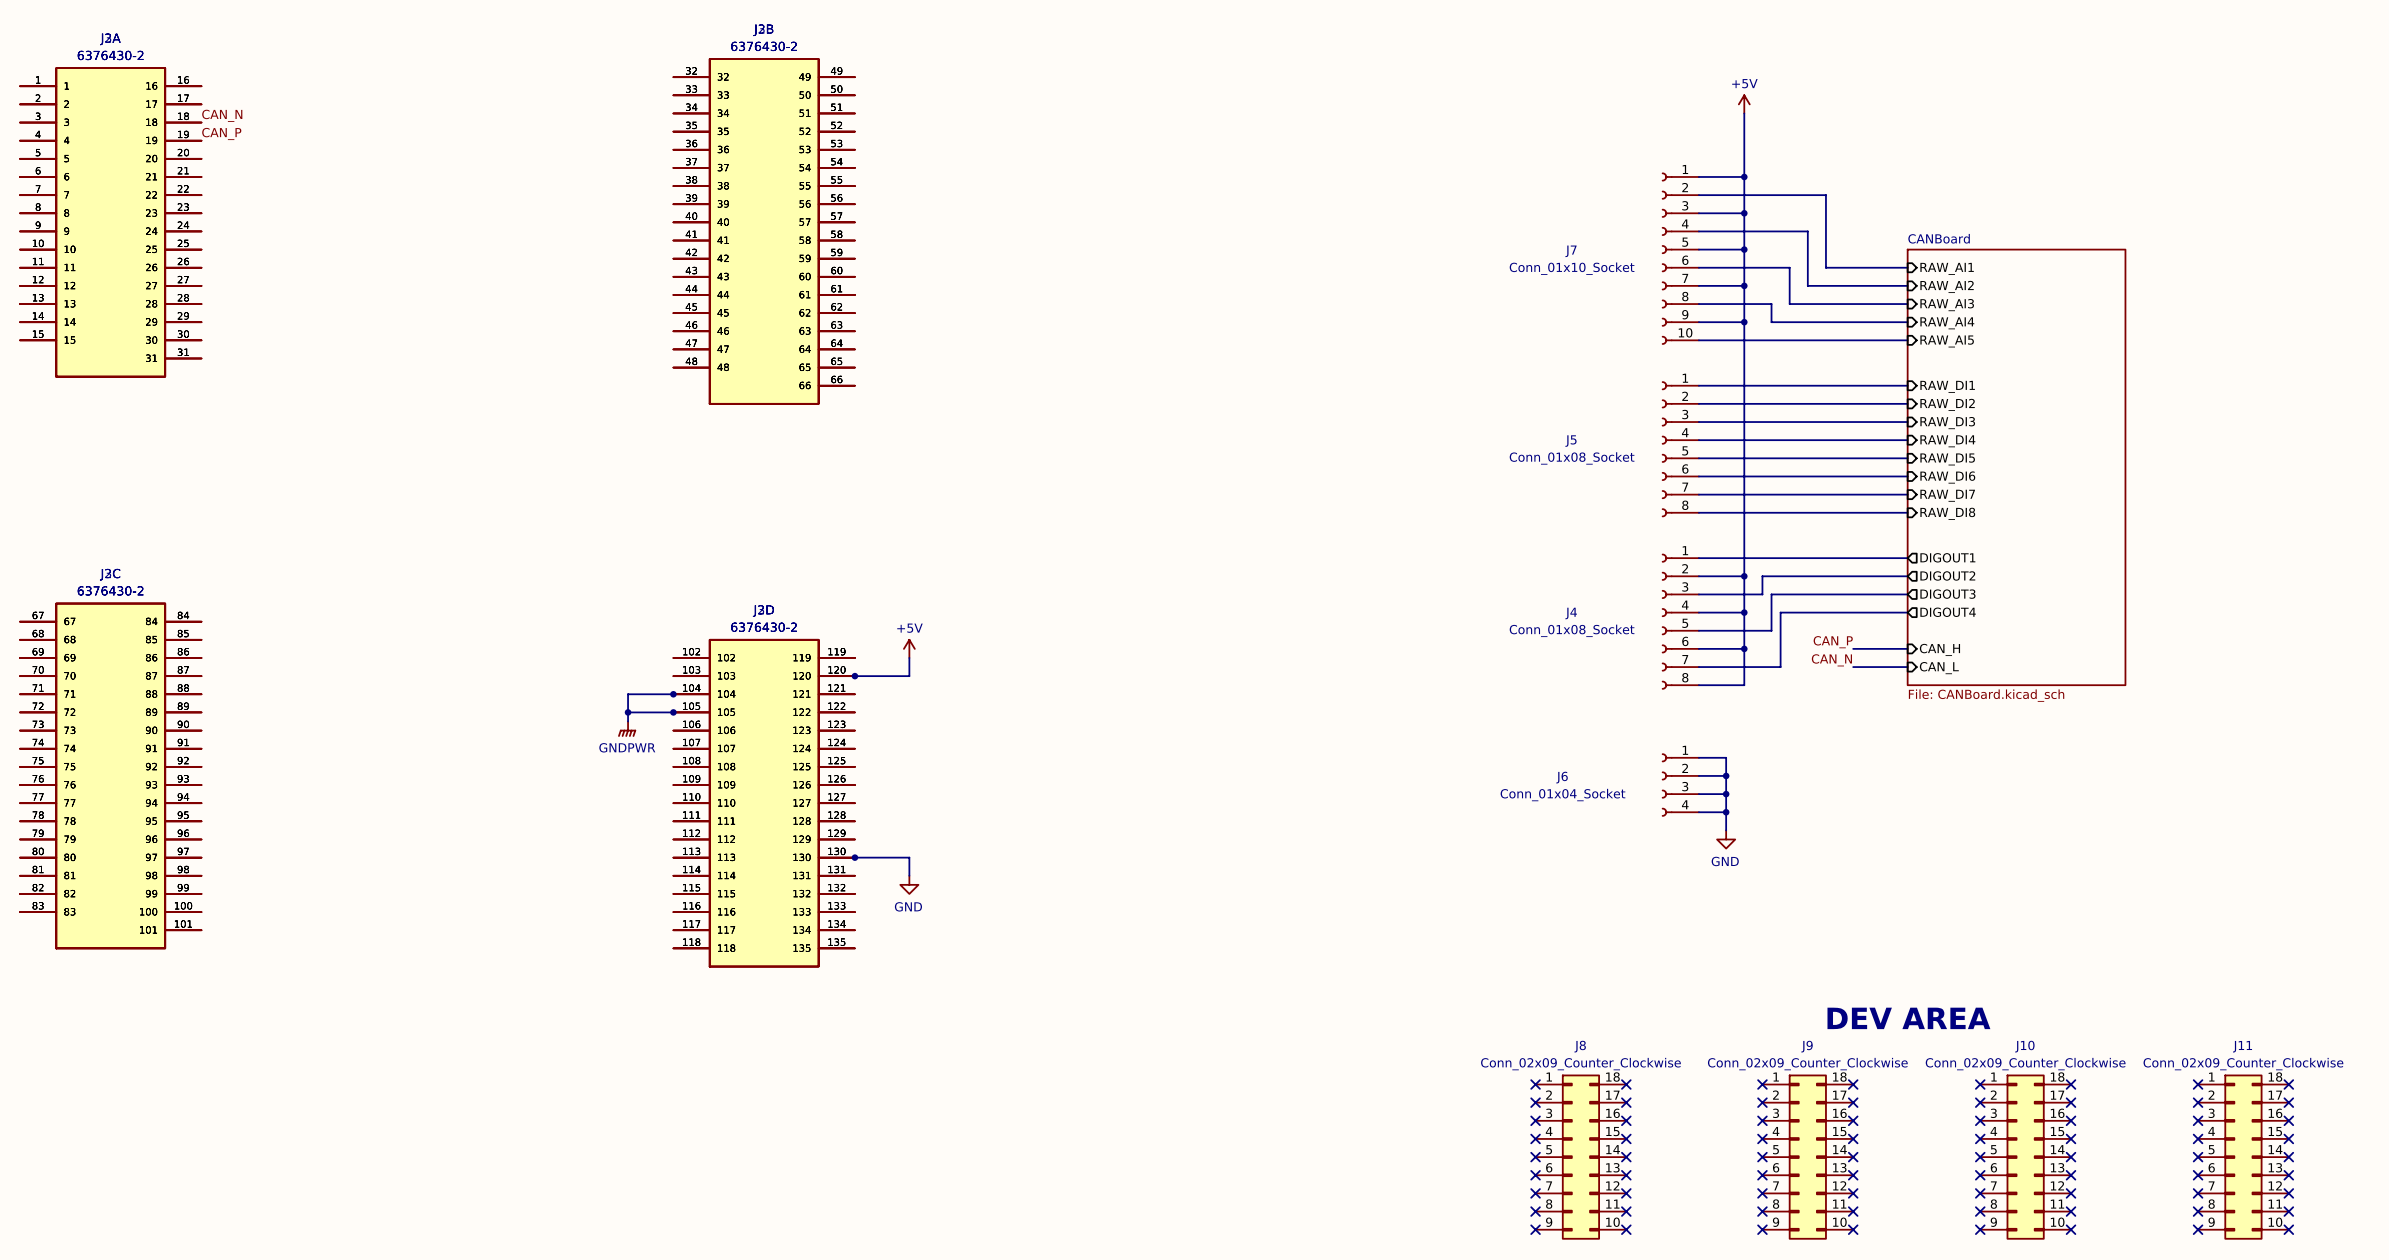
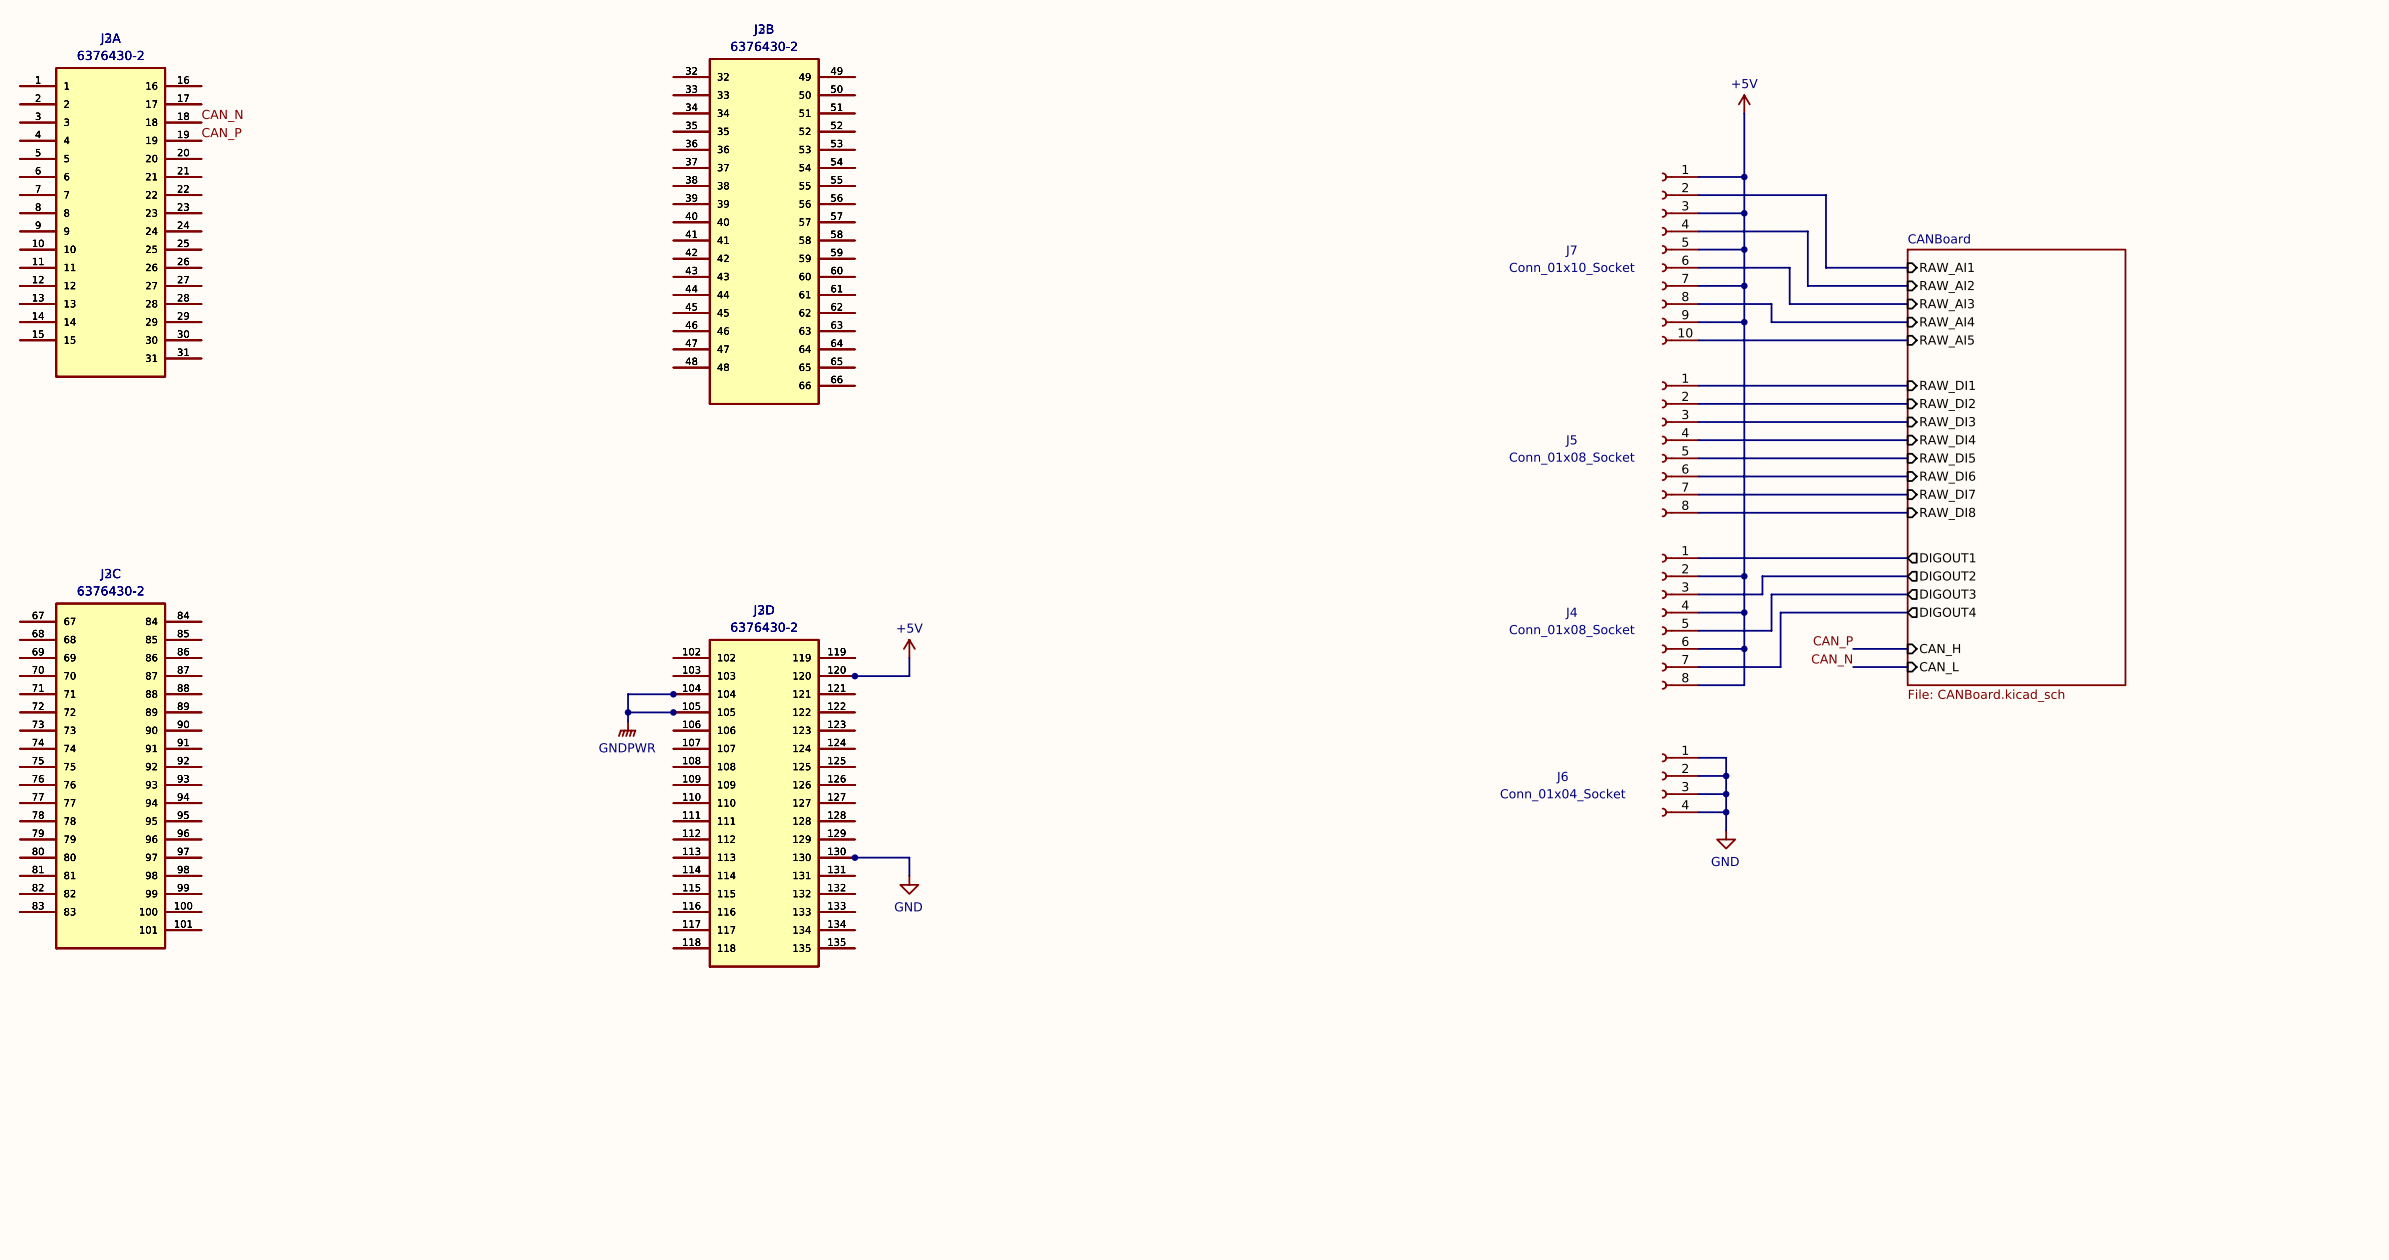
text: DEV AREA (1908, 1018) -> none
no-connect mark: (1535, 1084) -> none
no-connect mark: (1626, 1084) -> none
no-connect mark: (1762, 1084) -> none
no-connect mark: (1853, 1084) -> none
no-connect mark: (1980, 1084) -> none
no-connect mark: (2071, 1084) -> none
no-connect mark: (2198, 1084) -> none
no-connect mark: (2288, 1084) -> none
no-connect mark: (1535, 1102) -> none
no-connect mark: (1626, 1102) -> none
no-connect mark: (1762, 1102) -> none
no-connect mark: (1853, 1102) -> none
no-connect mark: (1980, 1102) -> none
no-connect mark: (2071, 1102) -> none
no-connect mark: (2198, 1102) -> none
no-connect mark: (2288, 1102) -> none
no-connect mark: (1535, 1120) -> none
no-connect mark: (1626, 1120) -> none
no-connect mark: (1762, 1120) -> none
no-connect mark: (1853, 1120) -> none
no-connect mark: (1980, 1120) -> none
no-connect mark: (2071, 1120) -> none
no-connect mark: (2198, 1120) -> none
no-connect mark: (2288, 1120) -> none
no-connect mark: (1535, 1138) -> none
no-connect mark: (1626, 1138) -> none
no-connect mark: (1762, 1138) -> none
no-connect mark: (1853, 1138) -> none
no-connect mark: (1980, 1138) -> none
no-connect mark: (2071, 1138) -> none
no-connect mark: (2198, 1138) -> none
no-connect mark: (2288, 1138) -> none
no-connect mark: (1535, 1157) -> none
J8: Conn_02x09_Counter_Clockwise (1580, 1157) -> none
no-connect mark: (1626, 1157) -> none
no-connect mark: (1762, 1157) -> none
J9: Conn_02x09_Counter_Clockwise (1807, 1157) -> none
no-connect mark: (1853, 1157) -> none
no-connect mark: (1980, 1157) -> none
J10: Conn_02x09_Counter_Clockwise (2025, 1157) -> none
no-connect mark: (2071, 1157) -> none
no-connect mark: (2198, 1157) -> none
J11: Conn_02x09_Counter_Clockwise (2243, 1157) -> none
no-connect mark: (2288, 1157) -> none
no-connect mark: (1535, 1175) -> none
no-connect mark: (1626, 1175) -> none
no-connect mark: (1762, 1175) -> none
no-connect mark: (1853, 1175) -> none
no-connect mark: (1980, 1175) -> none
no-connect mark: (2071, 1175) -> none
no-connect mark: (2198, 1175) -> none
no-connect mark: (2288, 1175) -> none
no-connect mark: (1535, 1193) -> none
no-connect mark: (1626, 1193) -> none
no-connect mark: (1762, 1193) -> none
no-connect mark: (1853, 1193) -> none
no-connect mark: (1980, 1193) -> none
no-connect mark: (2071, 1193) -> none
no-connect mark: (2198, 1193) -> none
no-connect mark: (2288, 1193) -> none
no-connect mark: (1535, 1211) -> none
no-connect mark: (1626, 1211) -> none
no-connect mark: (1762, 1211) -> none
no-connect mark: (1853, 1211) -> none
no-connect mark: (1980, 1211) -> none
no-connect mark: (2071, 1211) -> none
no-connect mark: (2198, 1211) -> none
no-connect mark: (2288, 1211) -> none
no-connect mark: (1535, 1229) -> none
no-connect mark: (1626, 1229) -> none
no-connect mark: (1762, 1229) -> none
no-connect mark: (1853, 1229) -> none
no-connect mark: (1980, 1229) -> none
no-connect mark: (2071, 1229) -> none
no-connect mark: (2198, 1229) -> none
no-connect mark: (2288, 1229) -> none

